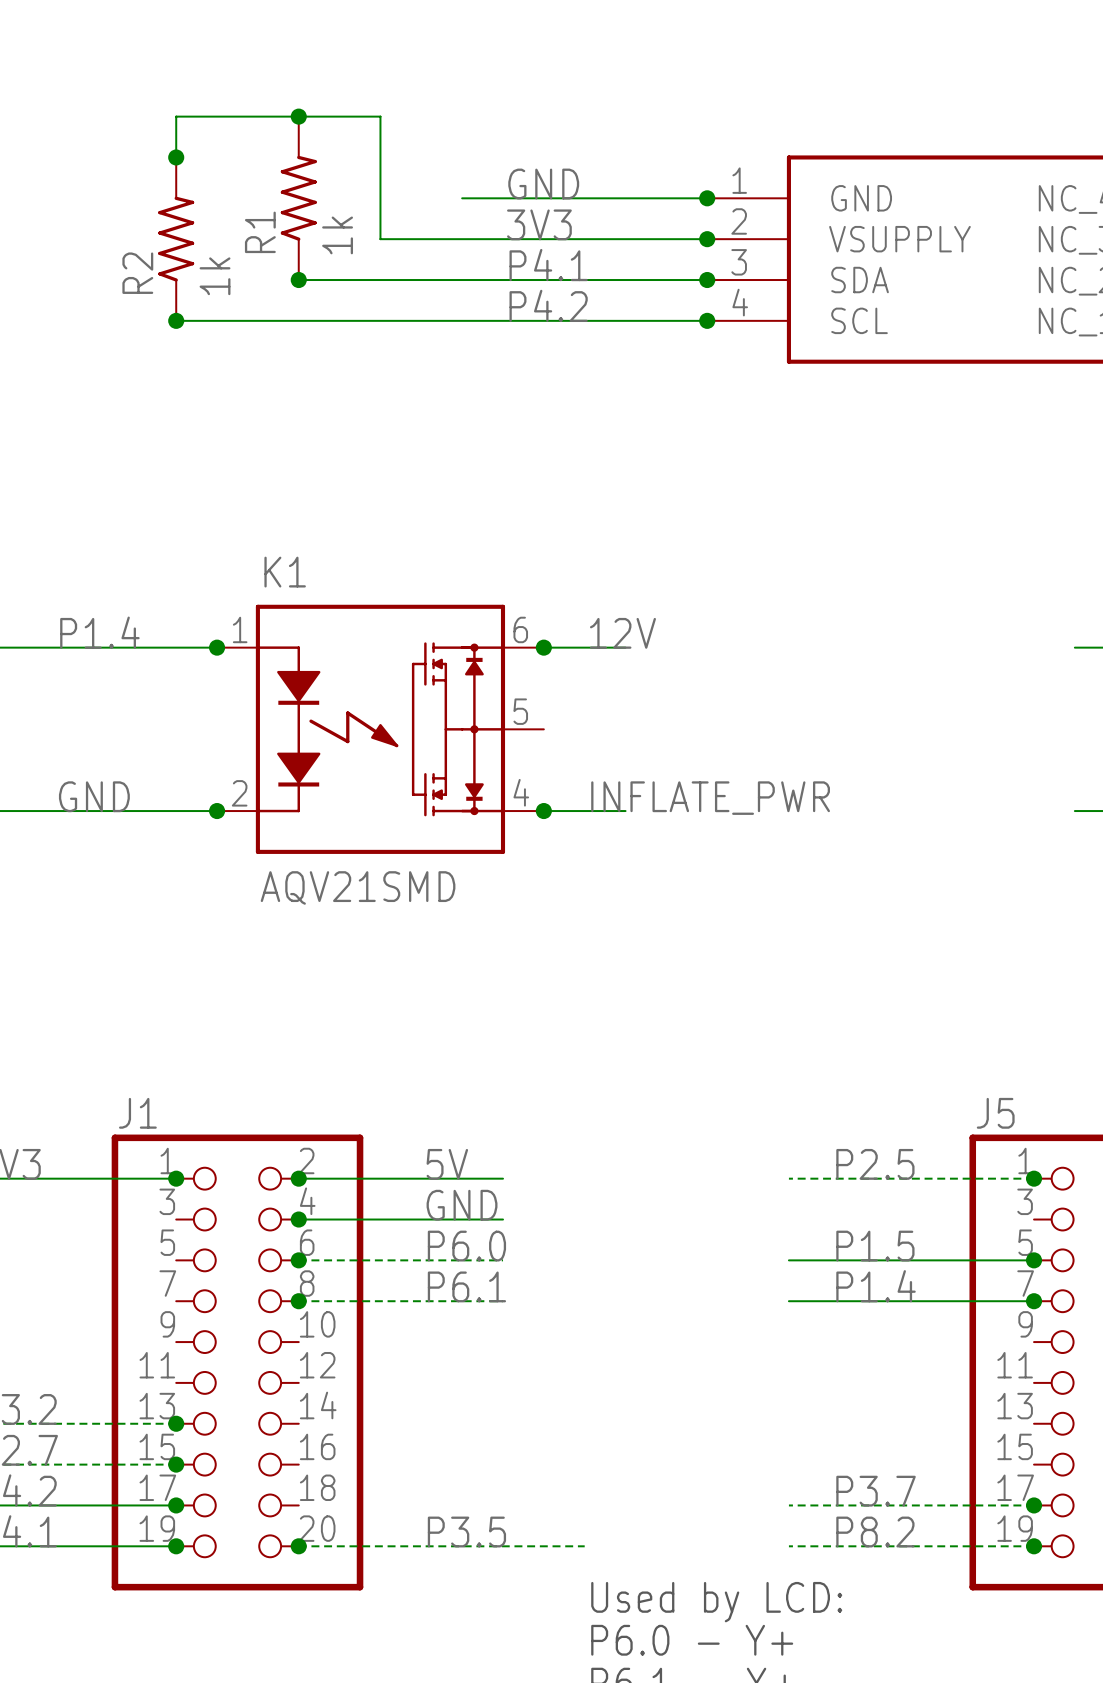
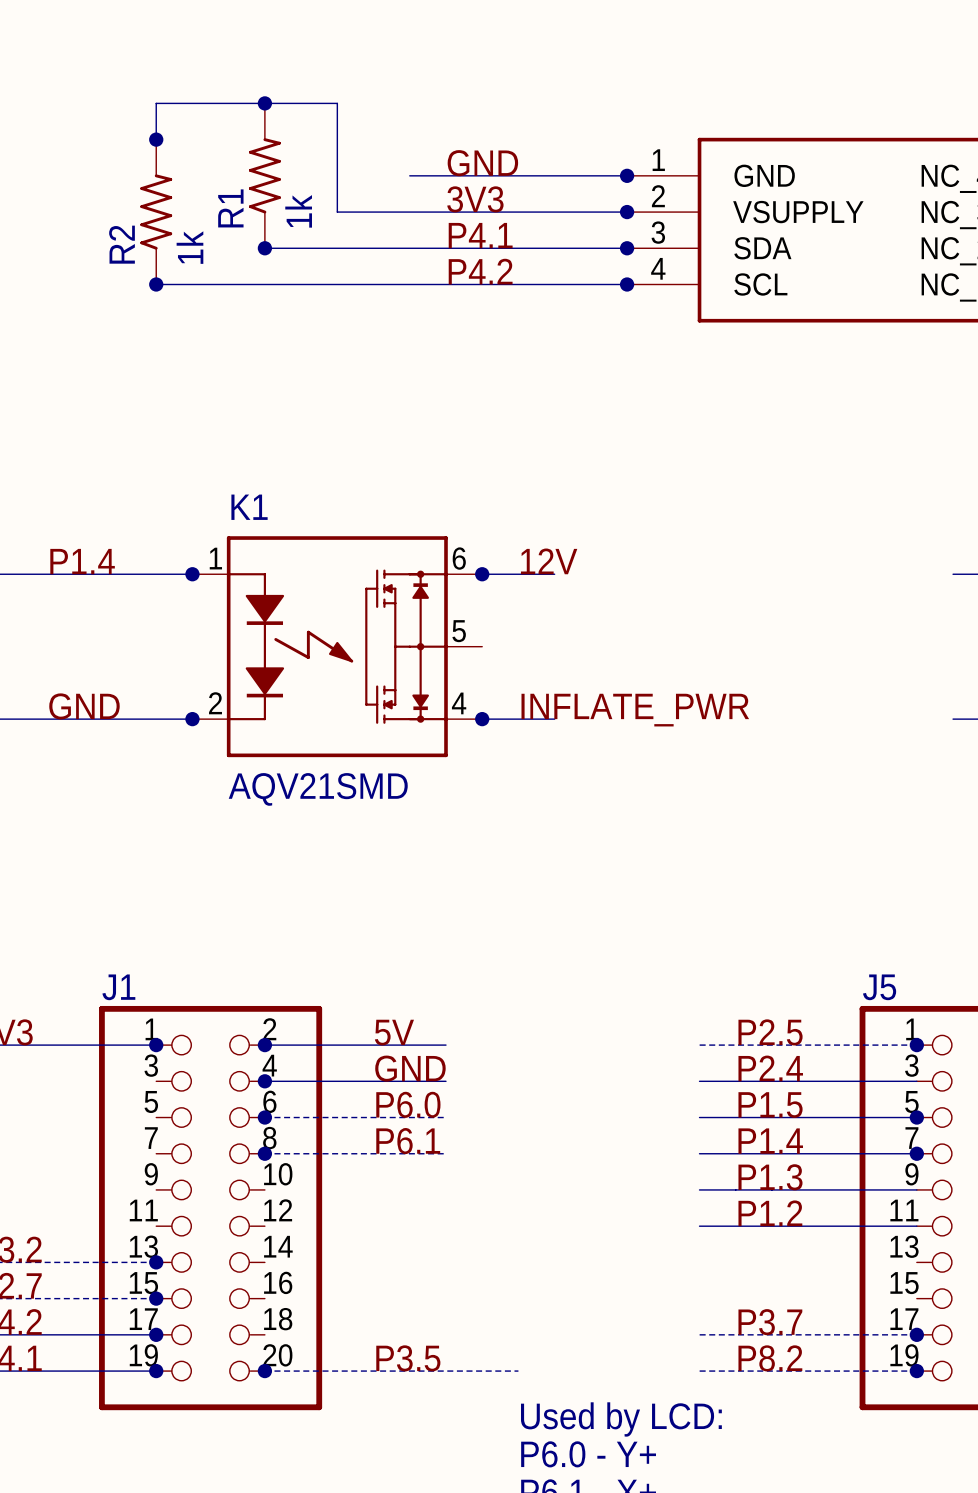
label: none -> P2.4 (770, 1068)
wire: none -> (699, 1081) (916, 1081)
label: none -> P1.3 (770, 1177)
wire: none -> (699, 1189) (916, 1189)
label: none -> P1.2 (770, 1213)
wire: none -> (699, 1226) (916, 1226)

